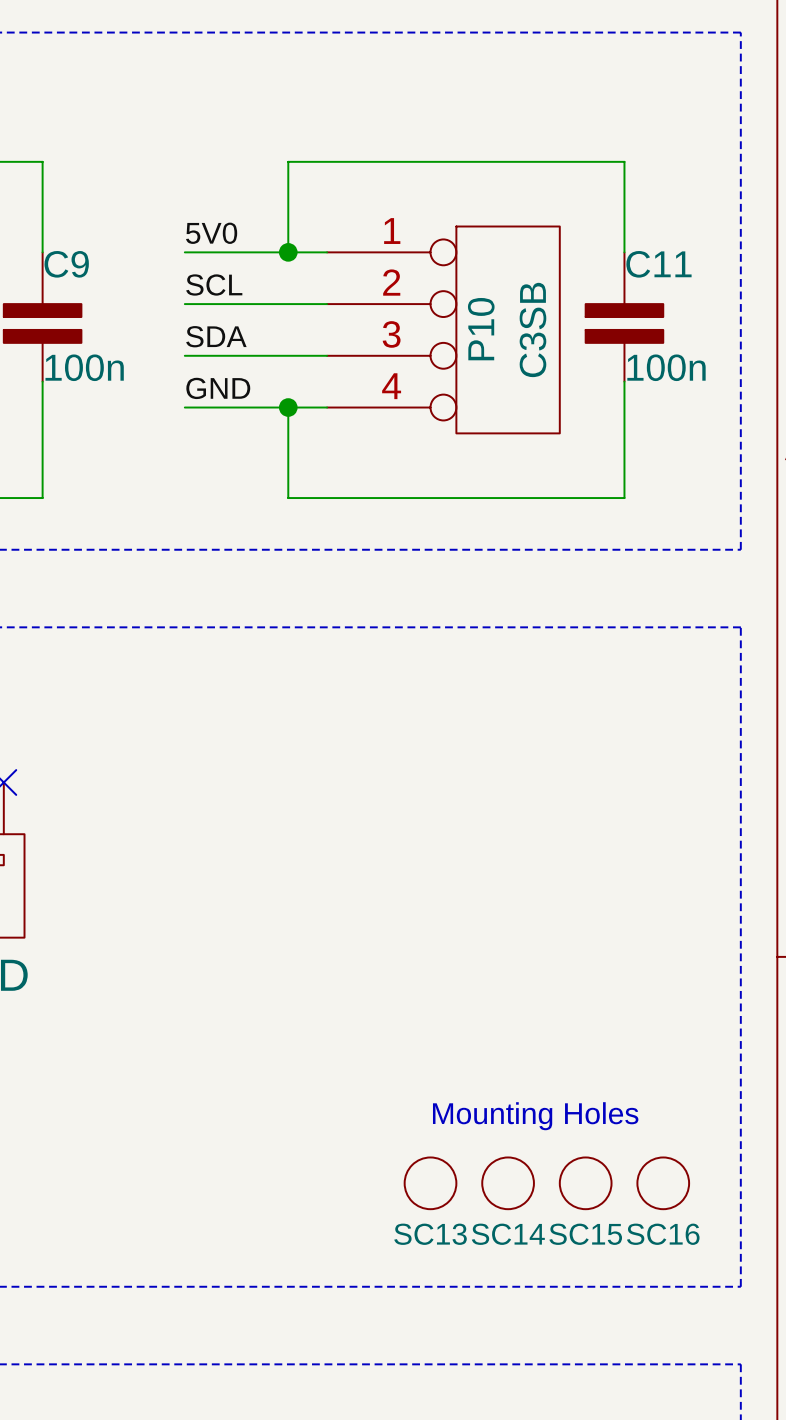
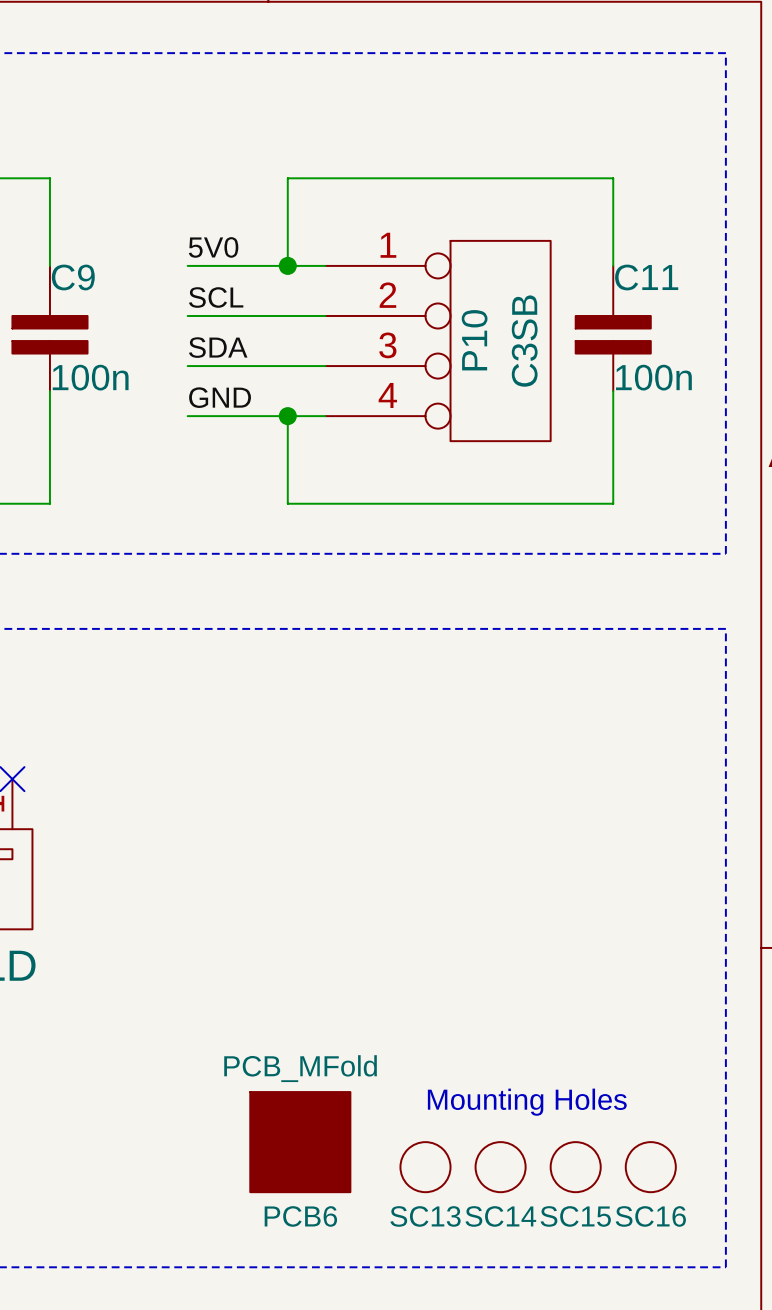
PCB6: none -> PCB_MFold (300, 1142)

